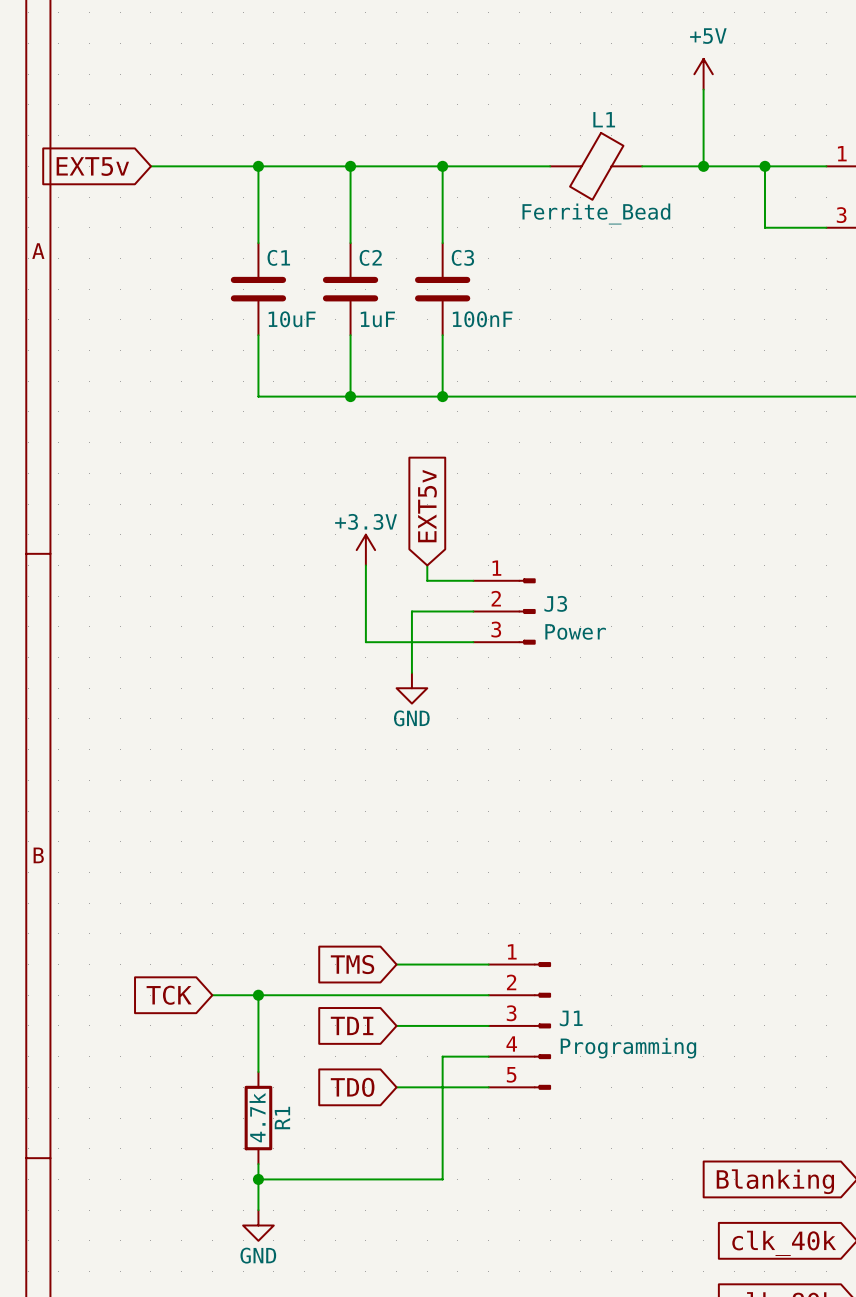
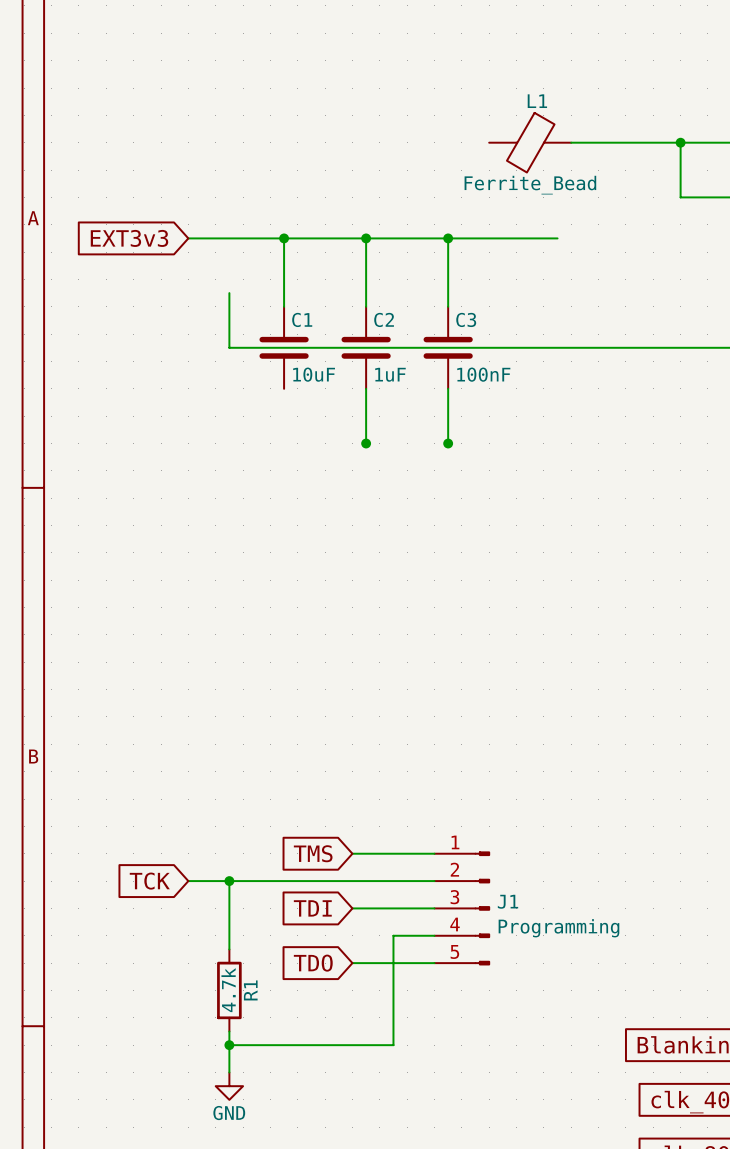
power symbol: +5V (703, 74) -> none
wire: (703, 89) (703, 166) -> none
global label: EXT5v (92, 166) -> none
wire: (150, 166) (550, 166) -> none
wire: (258, 166) (258, 243) -> (284, 238) (284, 306)
junction: (258, 166) -> none
wire: (350, 166) (350, 243) -> (366, 238) (366, 306)
junction: (350, 166) -> none
wire: (442, 166) (442, 243) -> (448, 238) (448, 306)
junction: (442, 166) -> none
junction: (703, 166) -> none
global label: none -> EXT3v3 (129, 238)
wire: none -> (188, 238) (557, 238)
junction: none -> (284, 238)
junction: none -> (366, 238)
junction: none -> (448, 238)
C1 position: (258, 289) -> (284, 347)
C2 position: (350, 289) -> (366, 347)
C3 position: (442, 289) -> (448, 347)
wire: (350, 335) (350, 396) -> (366, 388) (366, 443)
wire: (442, 335) (442, 396) -> (448, 388) (448, 443)
junction: (350, 396) -> none
junction: (442, 396) -> none
junction: none -> (366, 443)
junction: none -> (448, 443)
global label: EXT5v (427, 506) -> none
power symbol: +3.3V (365, 550) -> none
wire: (365, 565) (365, 642) (473, 642) -> none
wire: (427, 565) (427, 580) (473, 580) -> none
wire: (473, 611) (411, 611) (411, 672) -> none
J3: Power (504, 611) -> none
power symbol: GND (411, 688) -> none

